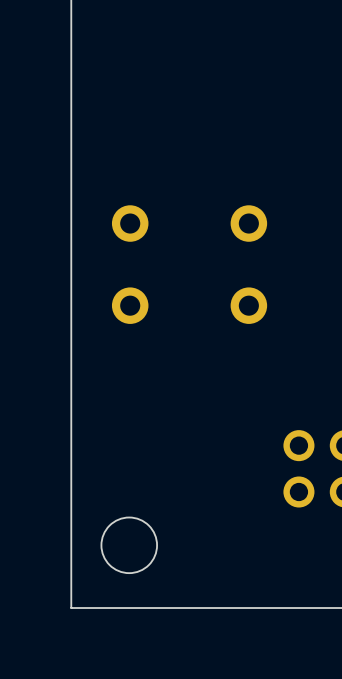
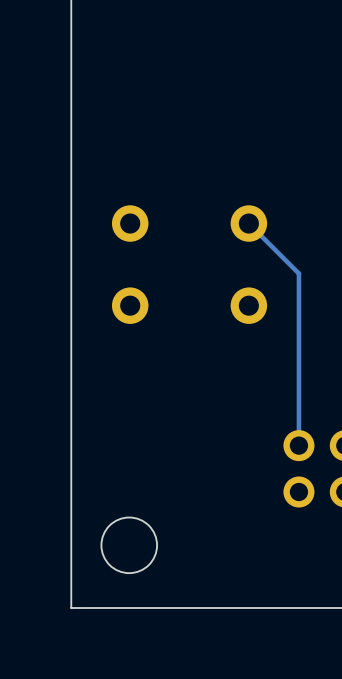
track: none -> (248, 223) (298, 273) (298, 445)

